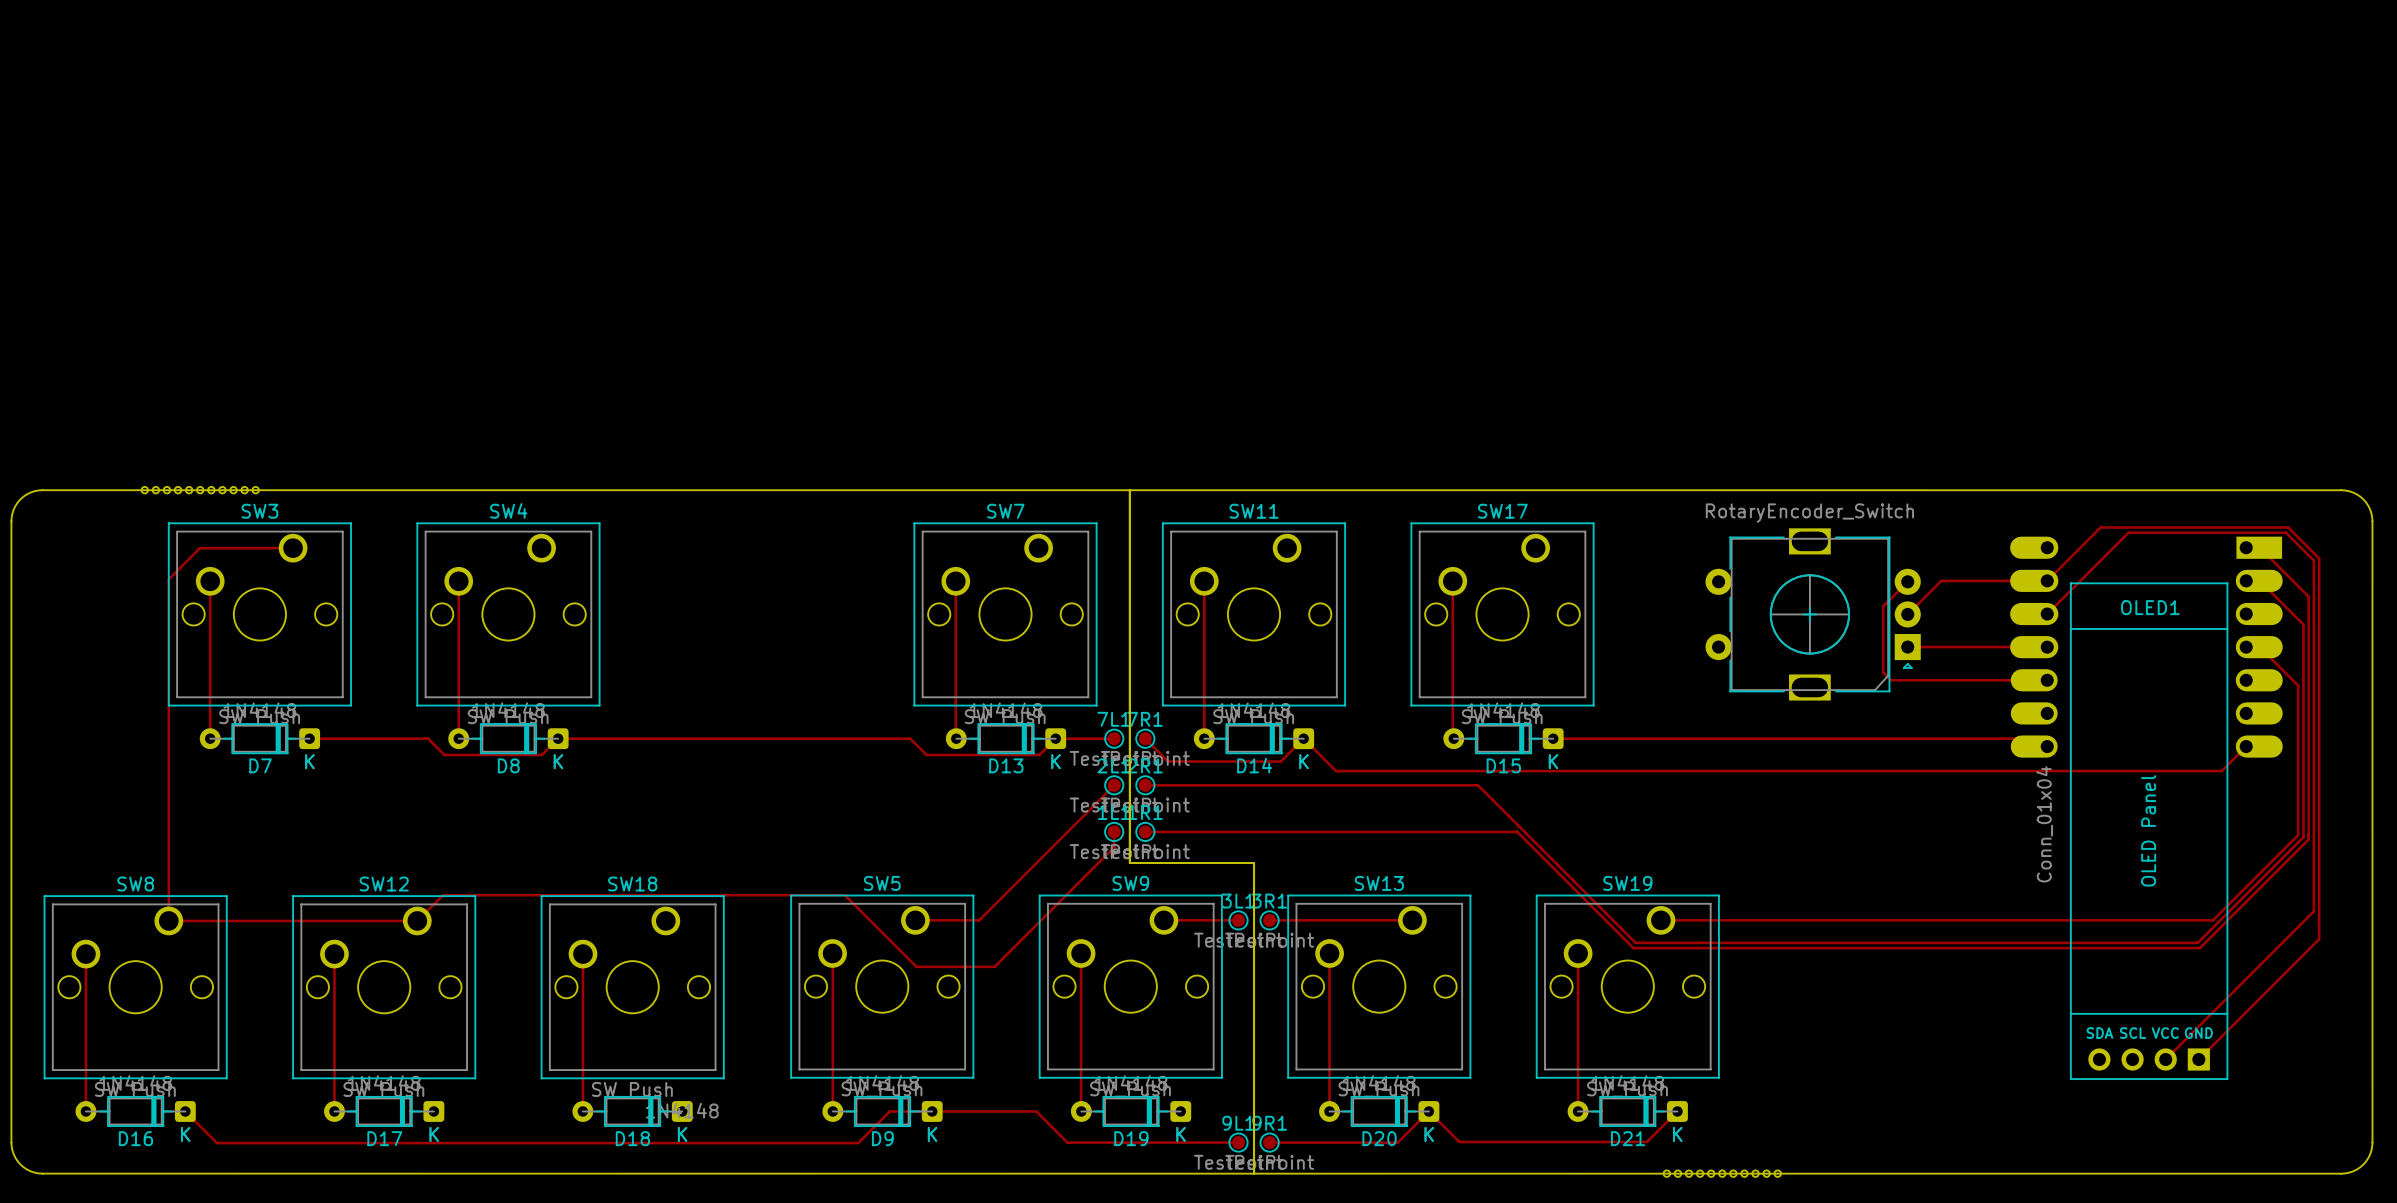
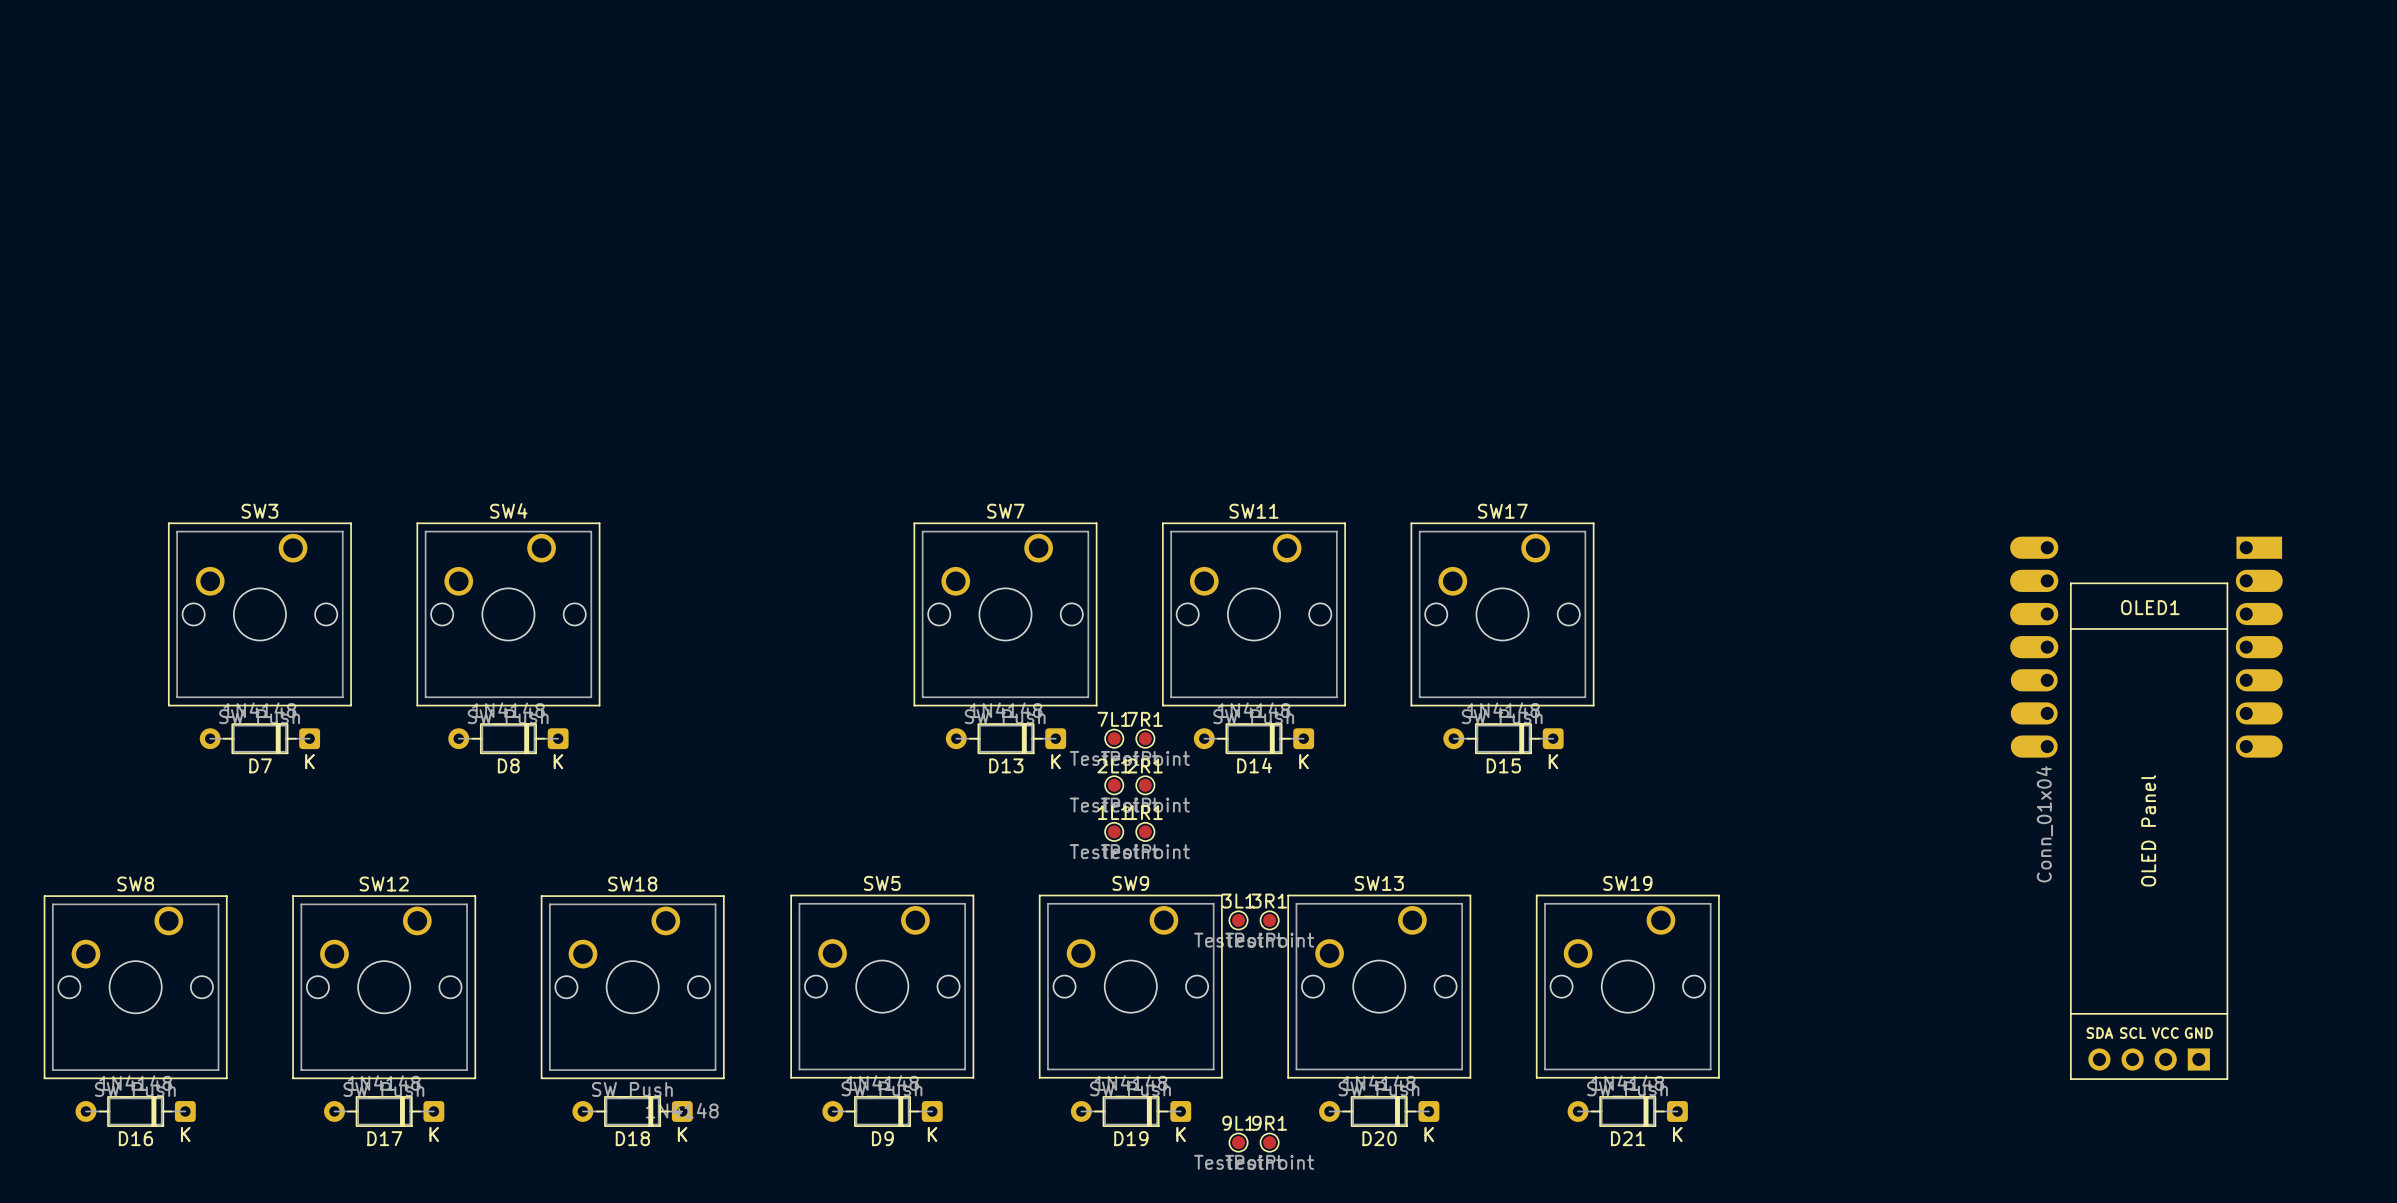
part: (200, 490) -> none
board edge: (1129, 490) (1129, 863) (1254, 863) -> none
track: (2259, 547) (2308, 596) (2308, 839) (2200, 948) (1633, 948) (1517, 831) (1145, 831) -> none
track: (293, 548) (199, 548) (168, 579) (168, 920) (417, 920) (443, 895) (844, 895) (916, 966) (994, 966) (1114, 847) (1114, 831) -> none
track: (2259, 580) (2303, 624) (2303, 837) (2197, 942) (1635, 942) (1478, 785) (1145, 785) -> none
track: (210, 581) (210, 738) -> none
track: (458, 581) (458, 738) -> none
track: (955, 581) (955, 738) -> none
track: (1204, 581) (1204, 738) -> none
track: (1452, 581) (1452, 737) -> none
track: (1907, 581) (1883, 606) (1883, 672) (1891, 680) (2047, 680) -> none
part: RotaryEncoder_Switch (1813, 614) -> none
track: (1907, 614) (1941, 580) (2047, 580) (2100, 527) (2288, 527) (2319, 558) (2319, 939) (2198, 1059) -> none
track: (2047, 614) (2128, 532) (2286, 532) (2313, 560) (2313, 911) (2165, 1059) -> none
track: (1907, 647) (2047, 647) -> none
track: (2259, 647) (2298, 685) (2298, 835) (2212, 920) (1660, 920) -> none
track: (309, 738) (428, 738) (444, 754) (541, 754) (558, 738) (910, 738) (926, 754) (1039, 754) (1055, 738) (1114, 738) -> none
track: (1145, 738) (1168, 761) (1280, 761) (1303, 738) (1336, 771) (2221, 771) (2246, 746) -> none
track: (1553, 738) (2039, 738) -> none
track: (1114, 785) (979, 920) (915, 920) -> none
board edge: (1129, 863) (1254, 863) (1254, 1173) -> none
track: (1163, 920) (1238, 920) -> none
track: (1269, 920) (1289, 920) -> none
track: (1289, 920) (1412, 920) -> none
track: (832, 953) (832, 1111) -> none
track: (1081, 953) (1081, 1111) -> none
track: (1329, 953) (1329, 1111) -> none
track: (1578, 953) (1578, 992) -> none
track: (85, 954) (85, 1111) -> none
track: (334, 954) (334, 1111) -> none
track: (583, 954) (583, 1111) -> none
track: (1578, 992) (1578, 1111) -> none
track: (185, 1111) (216, 1143) (858, 1143) (889, 1111) (1036, 1111) (1067, 1142) -> none
track: (1677, 1111) (1646, 1141) (1459, 1141) (1428, 1111) (1397, 1142) (1269, 1142) -> none
track: (1067, 1142) (1238, 1142) -> none
board edge: (2372, 1142) (2370, 1154) (2363, 1164) (2353, 1171) (2341, 1173) (34, 1172) (26, 1169) (17, 1161) (13, 1154) (11, 1142) (12, 513) (15, 505) (23, 496) (30, 492) (42, 490) (2349, 491) (2360, 496) (2366, 502) (2371, 513) (2372, 521) (2372, 1142) -> none
part: (1722, 1173) -> none

